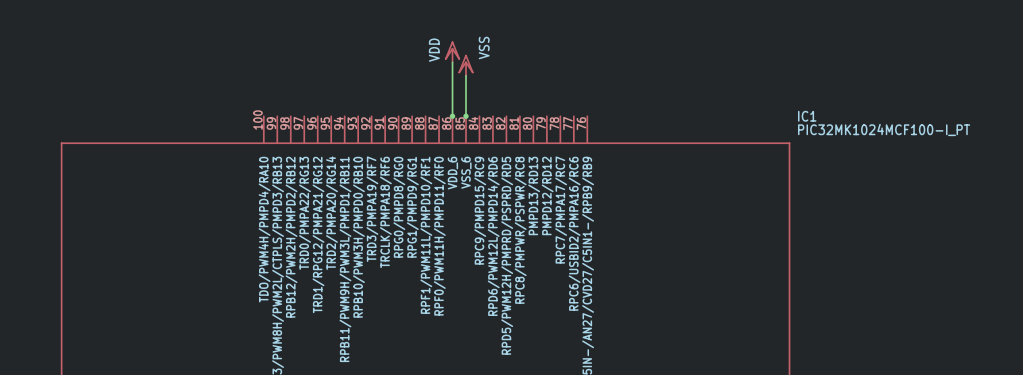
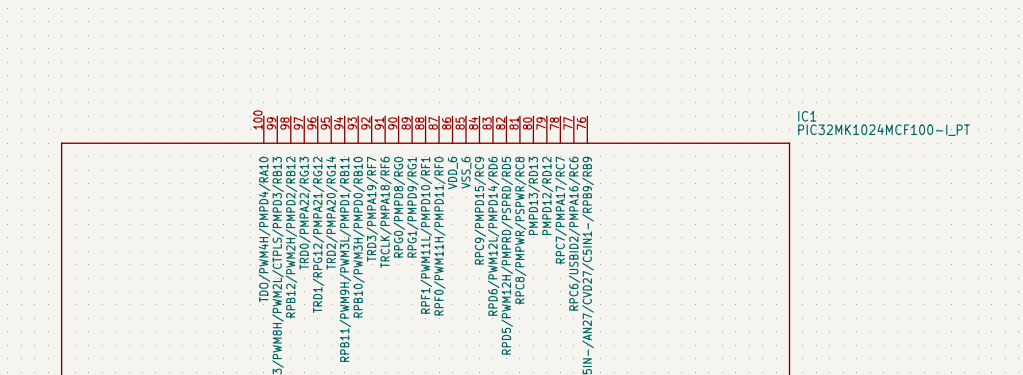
power symbol: VDD (452, 51) -> none
wire: (452, 62) (452, 116) -> none
power symbol: VSS (466, 65) -> none
wire: (466, 75) (466, 116) -> none
junction: (452, 116) -> none
junction: (466, 116) -> none

